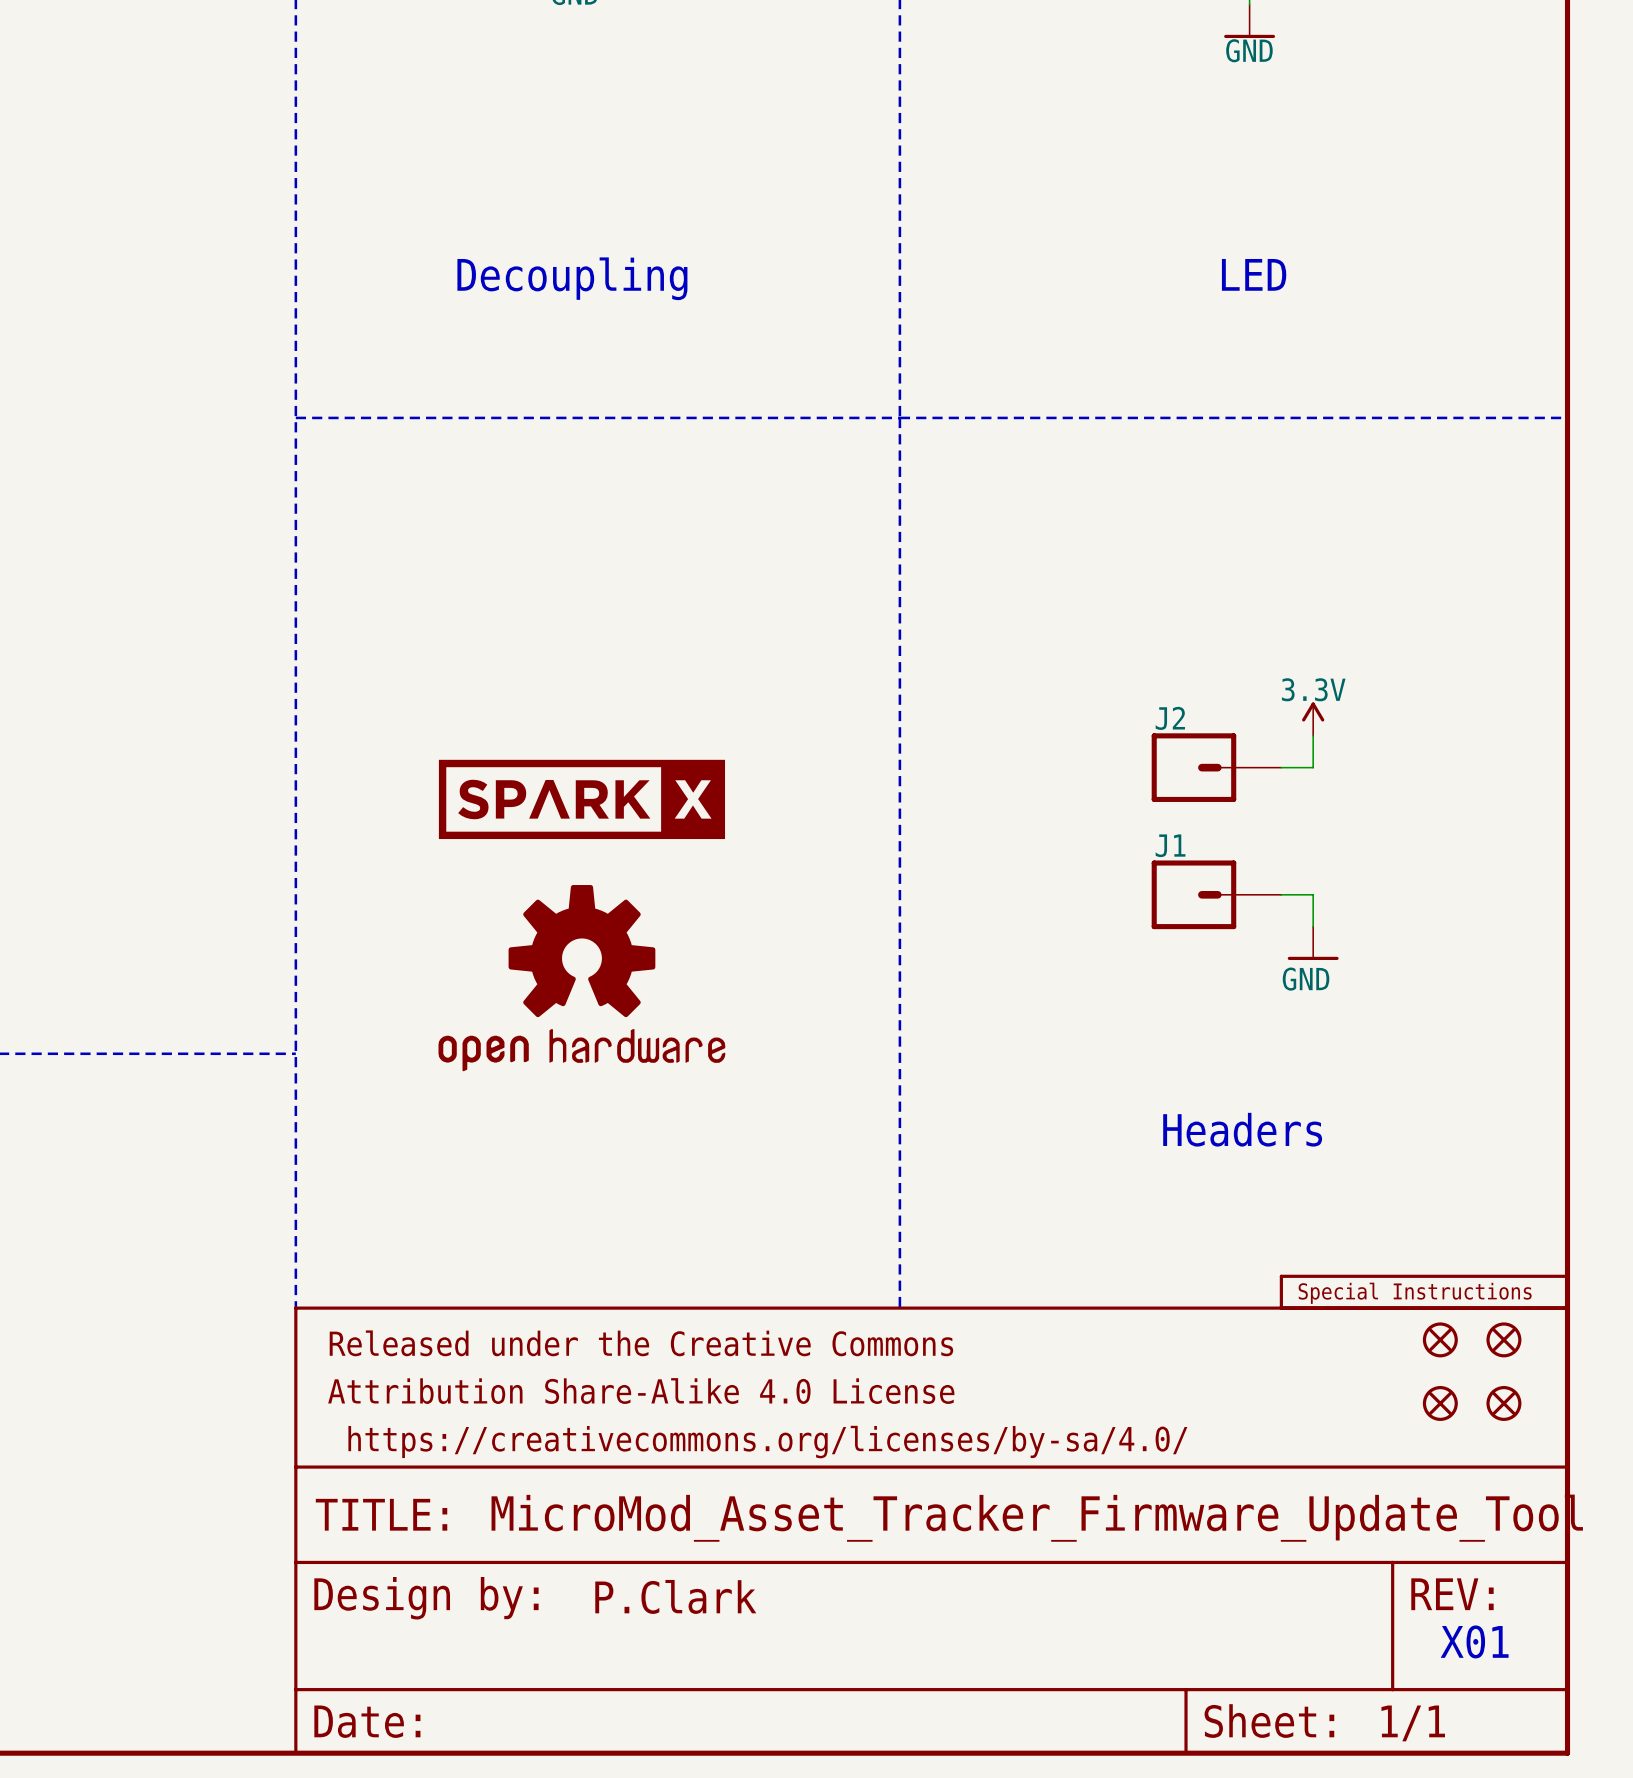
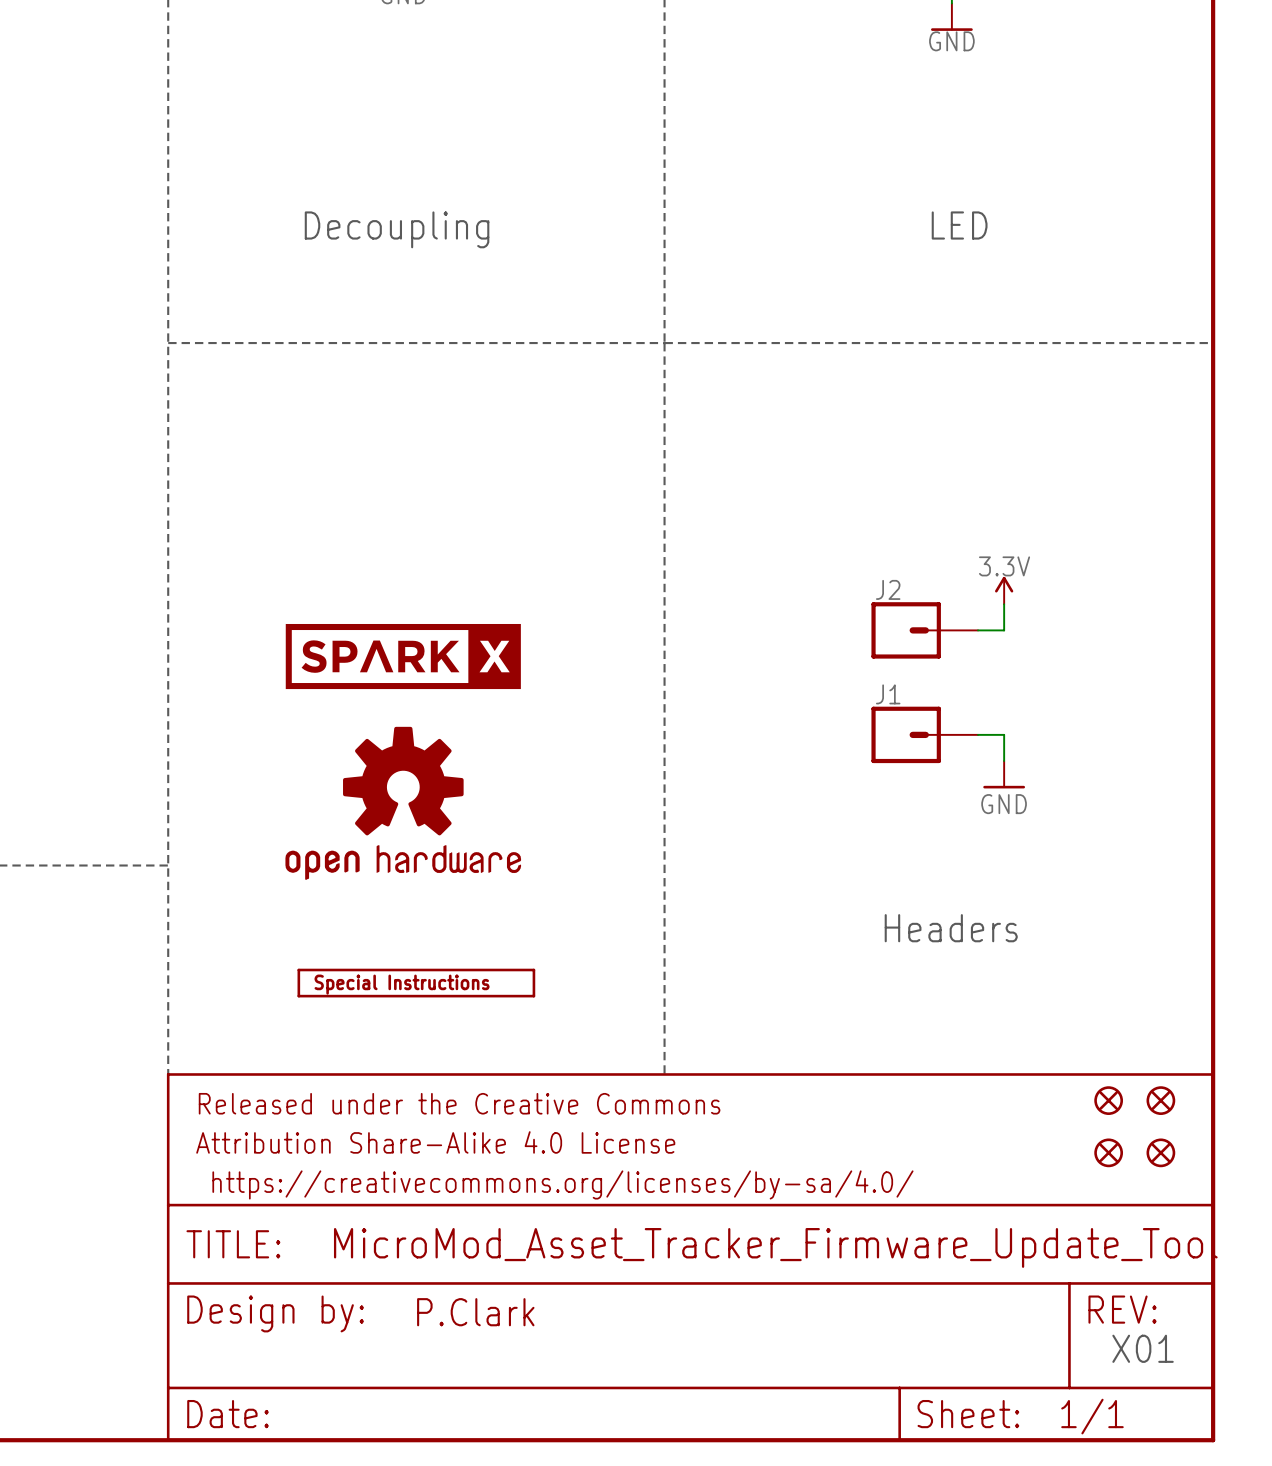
part: none -> (416, 983)
part: (1424, 1292) -> none

